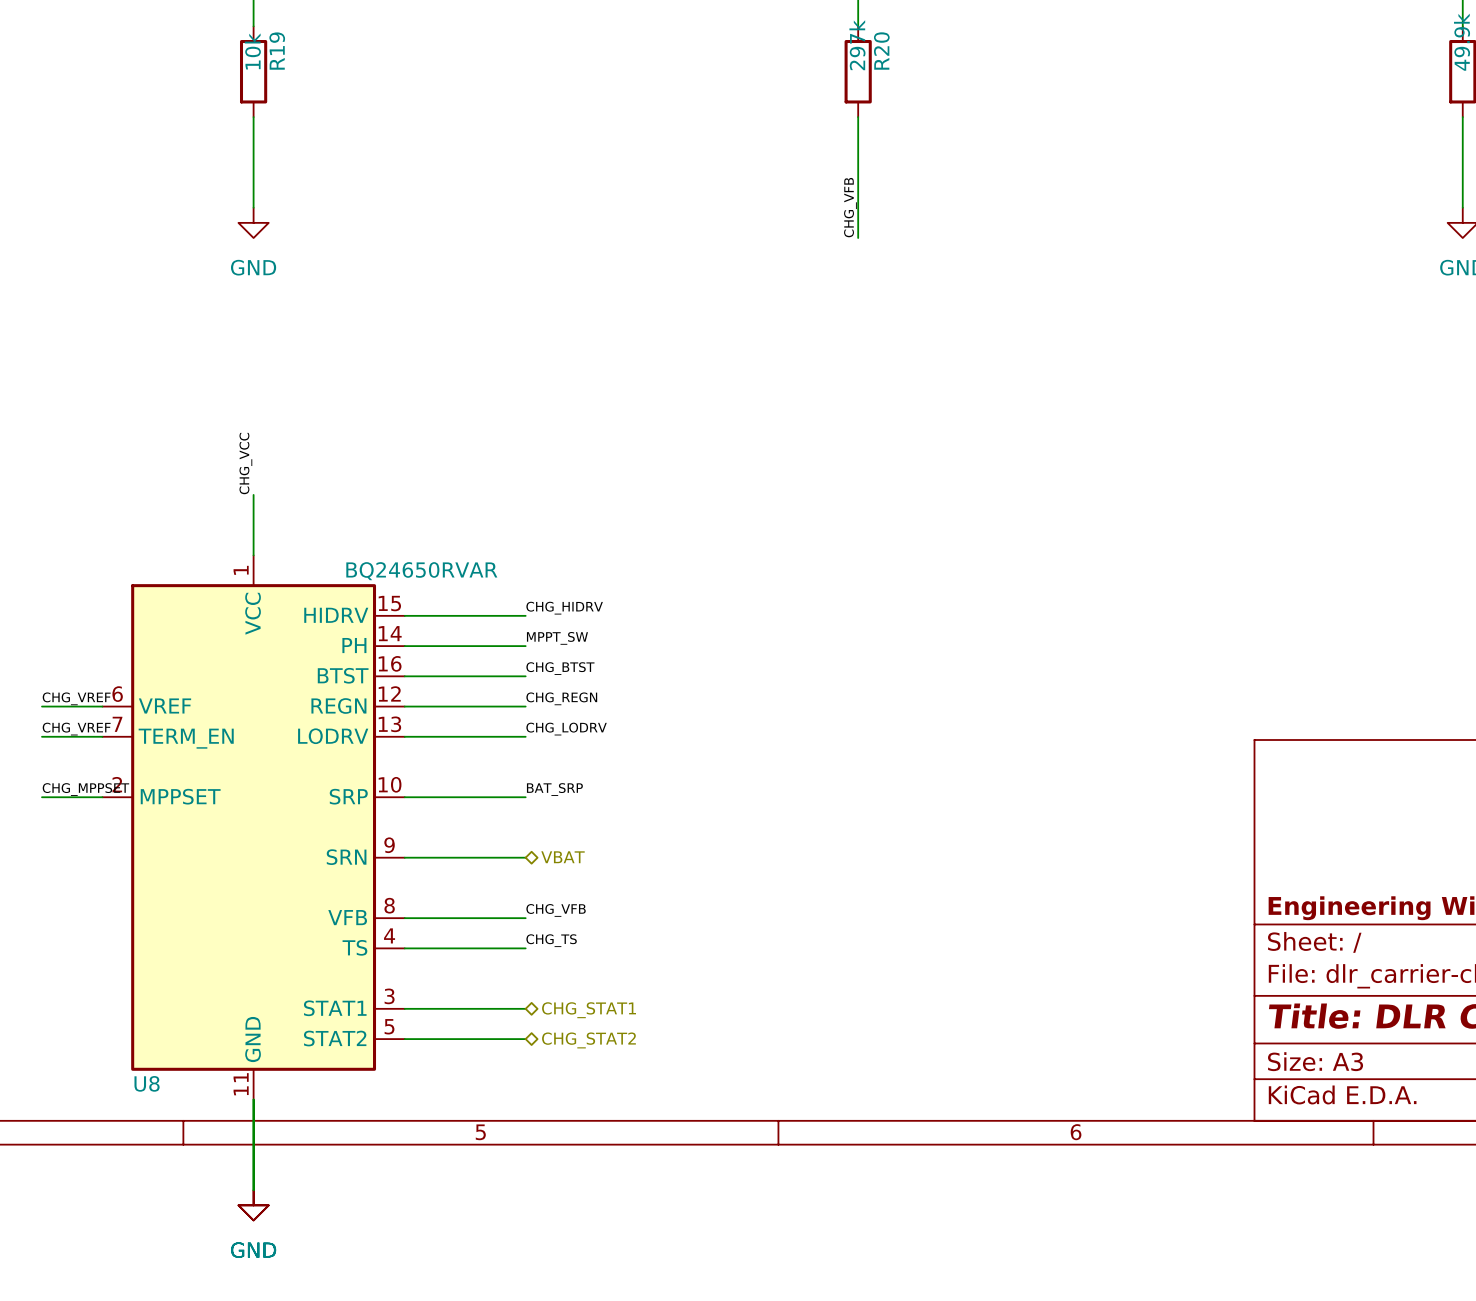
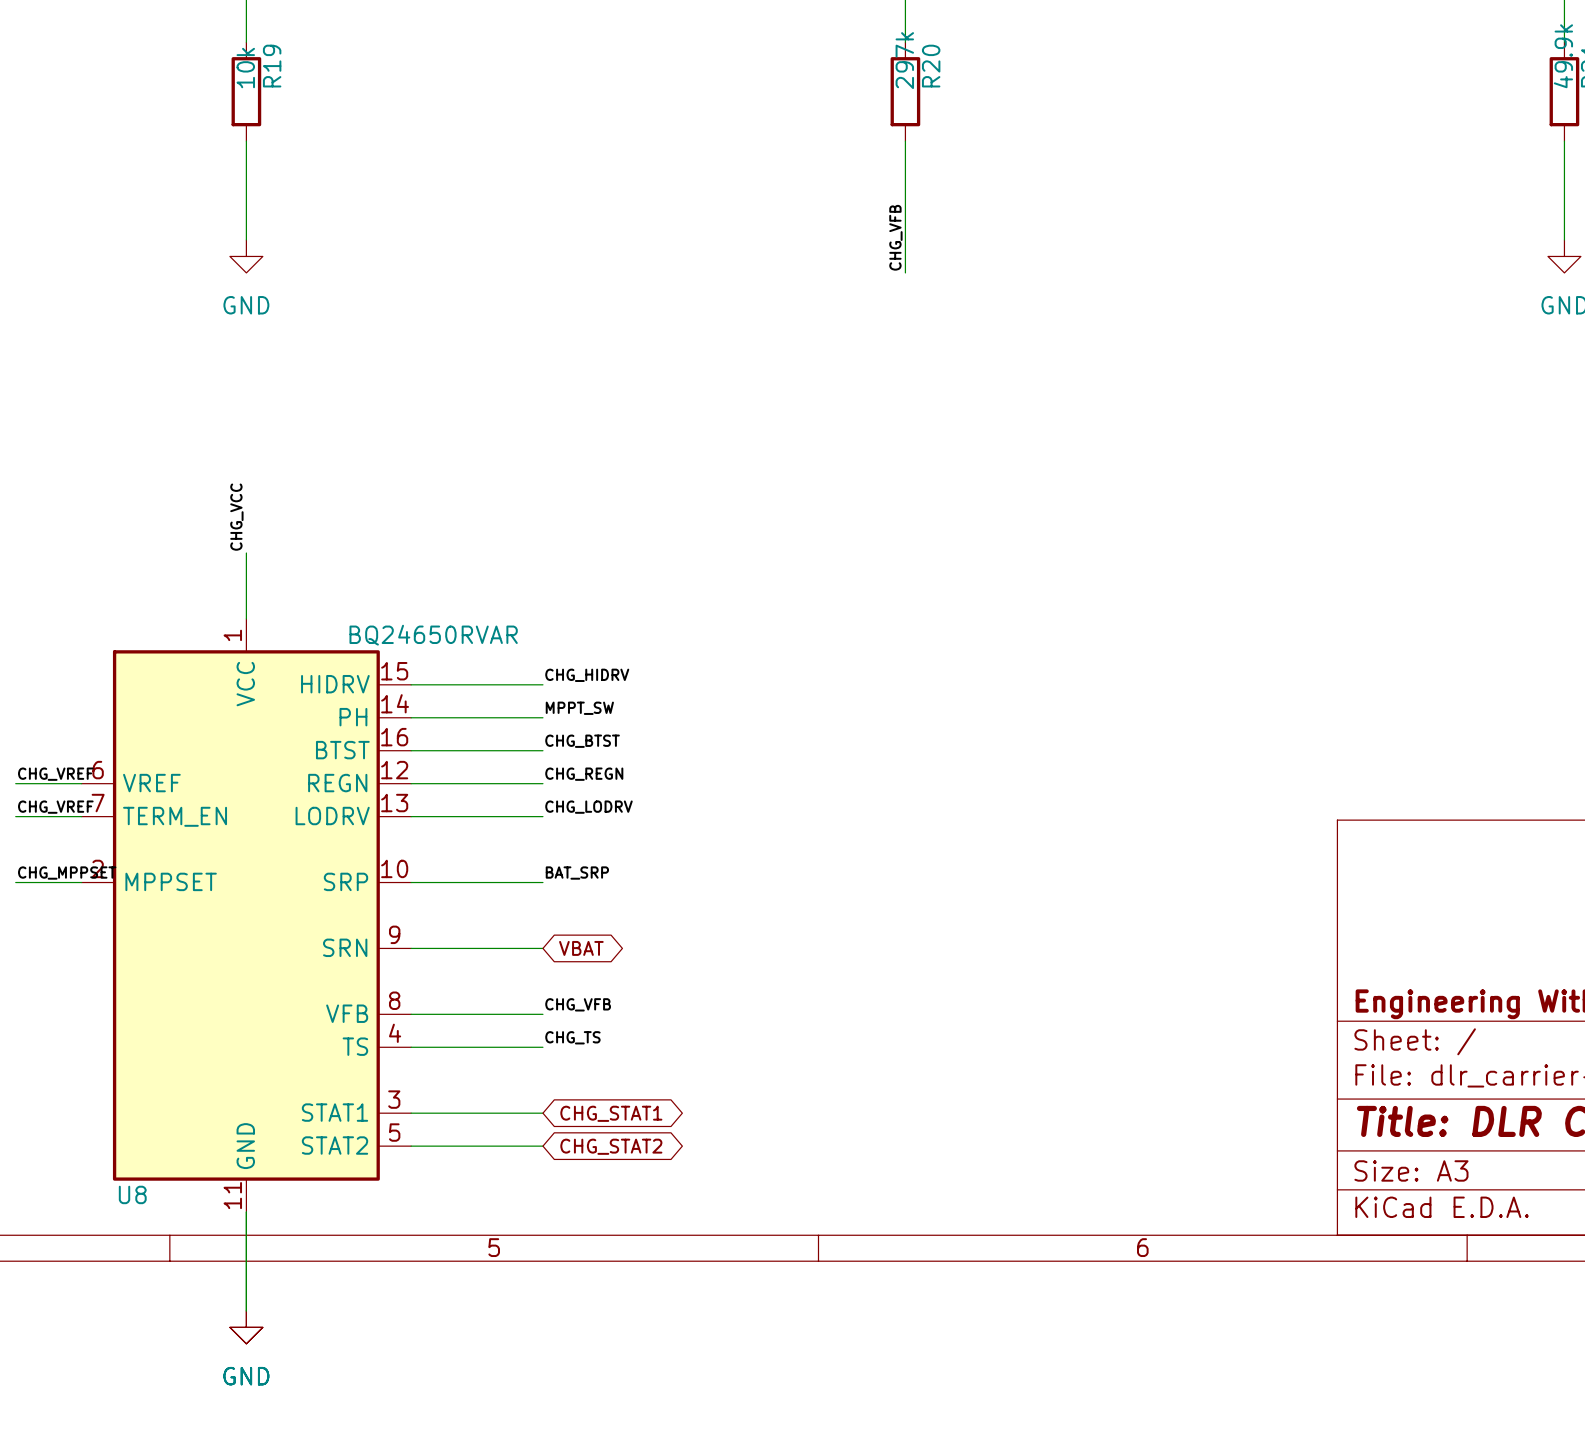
global label: none -> VBAT (581, 948)
hierarchical label: VBAT (563, 857) -> none
global label: none -> CHG_STAT1 (611, 1113)
hierarchical label: CHG_STAT1 (589, 1010) -> none
global label: none -> CHG_STAT2 (611, 1146)
hierarchical label: CHG_STAT2 (588, 1040) -> none

